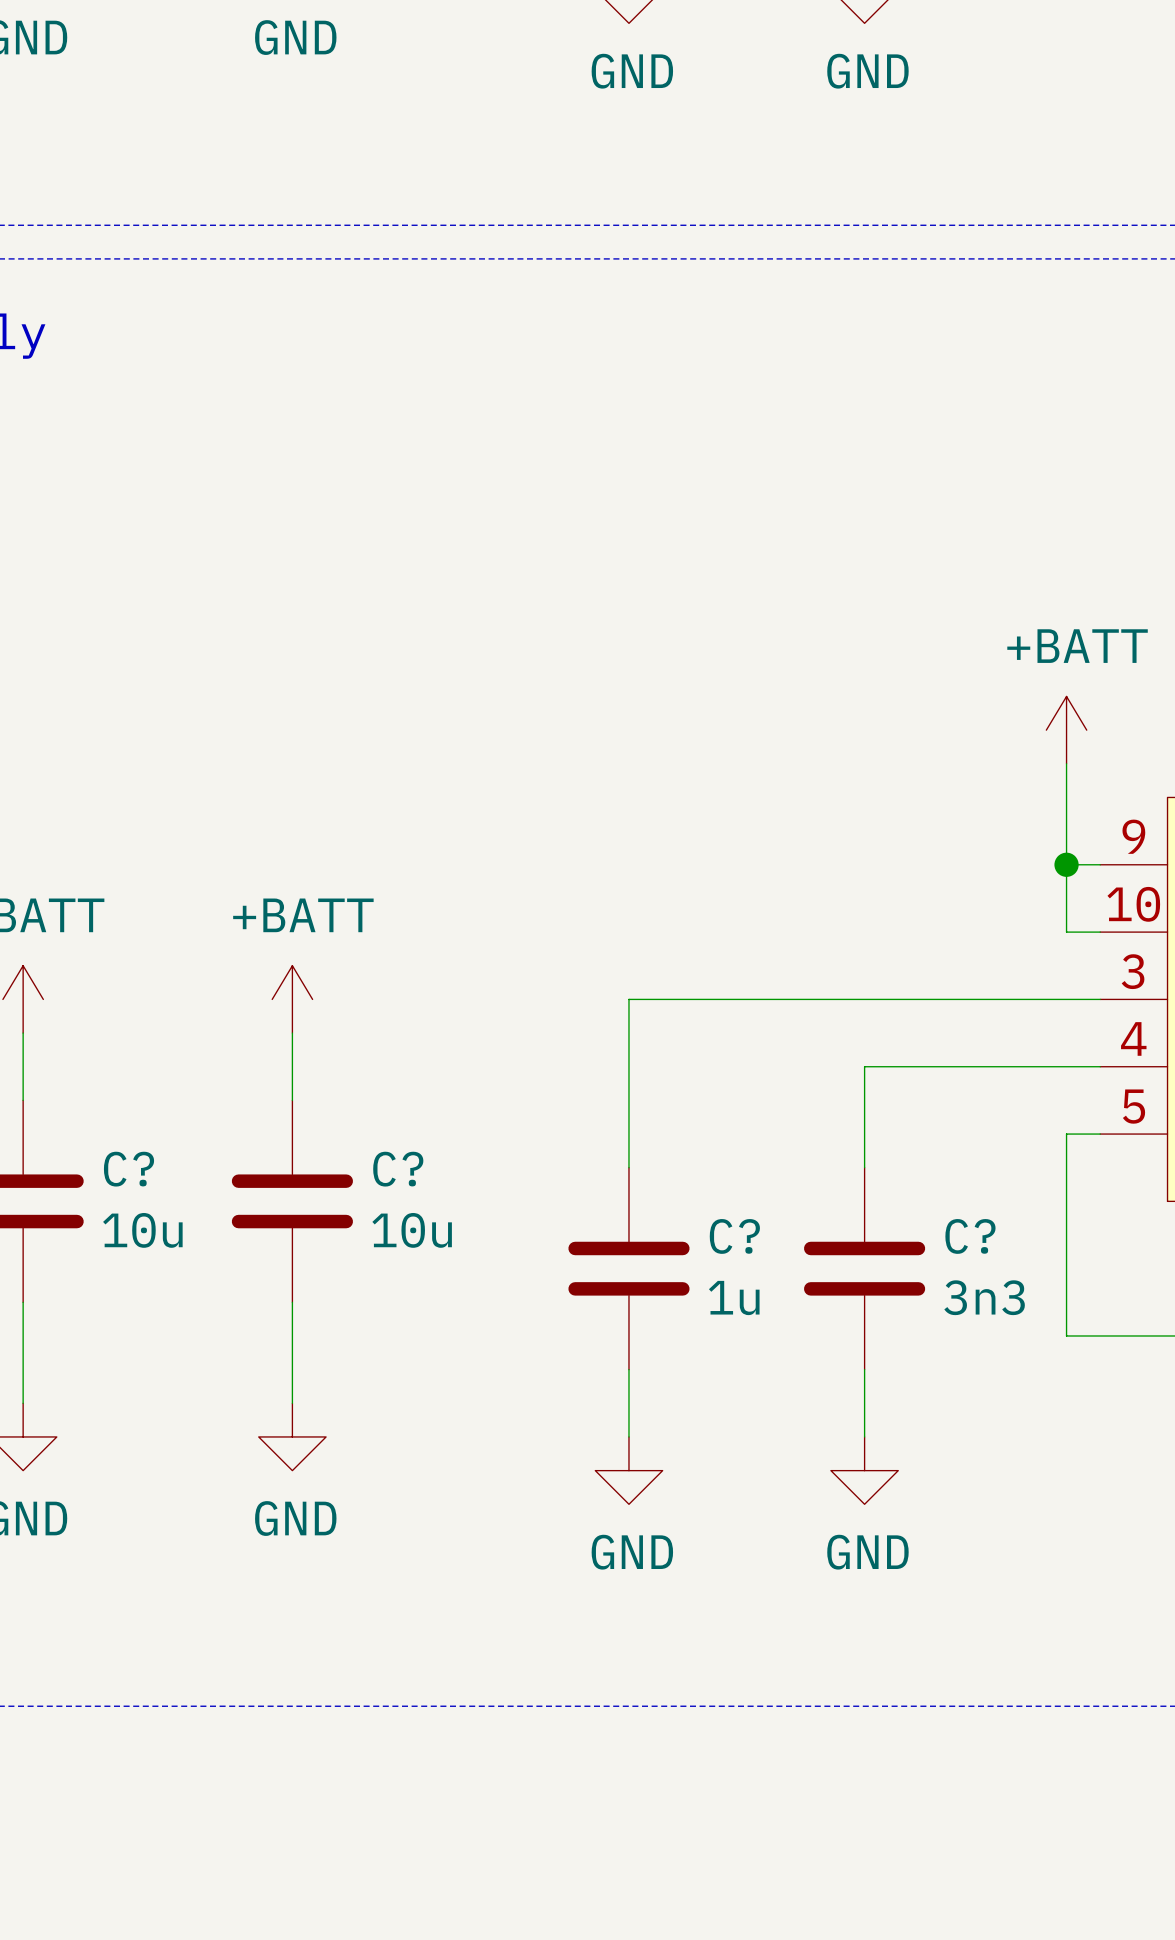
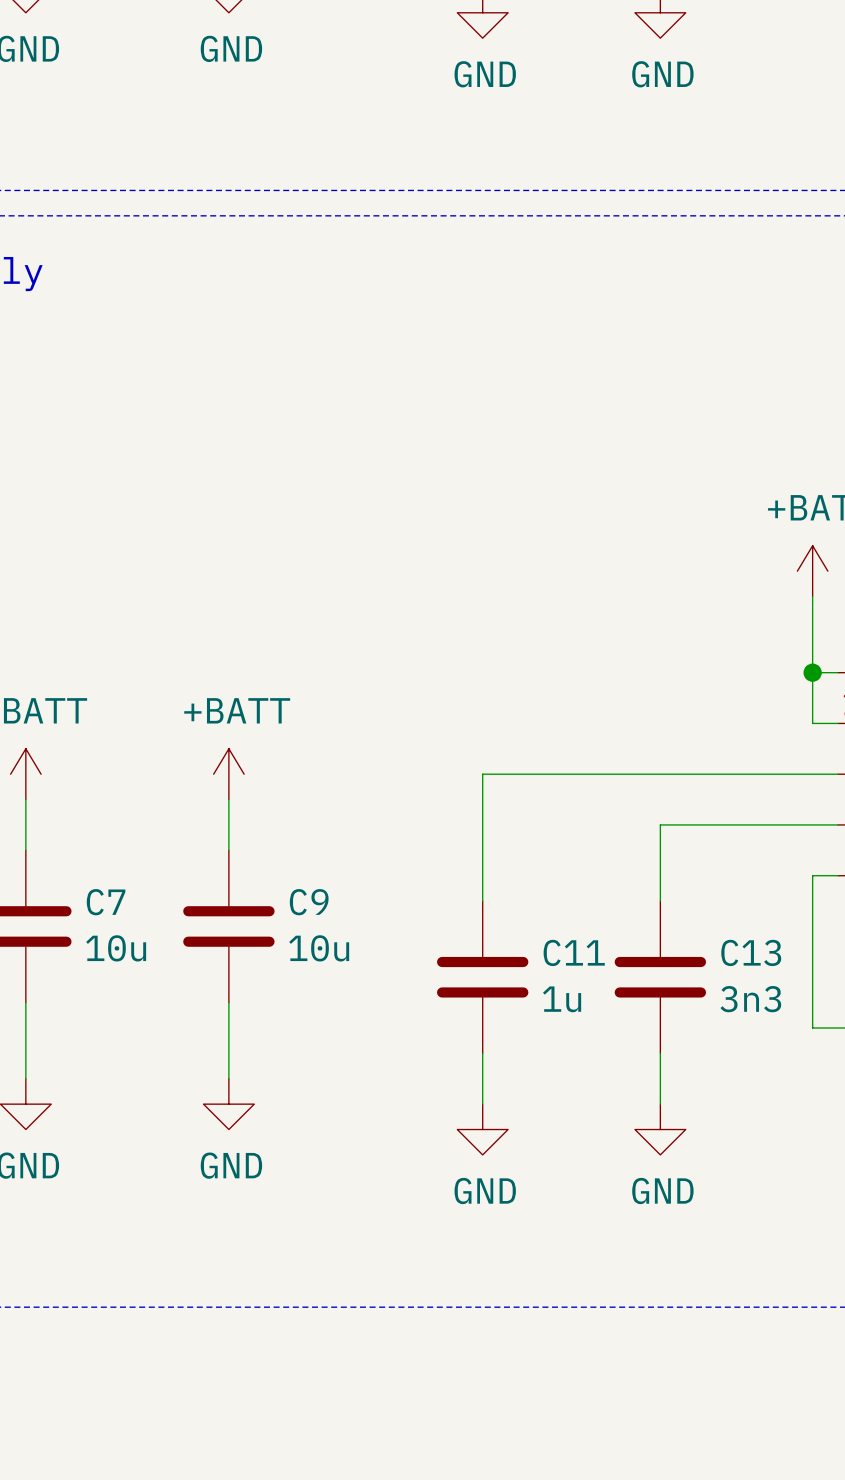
C? name: C? (129, 1169) -> C7 (106, 902)
C? name: C? (398, 1169) -> C9 (309, 902)
C? name: C? (734, 1236) -> C11 (574, 952)
C? name: C? (970, 1236) -> C13 (751, 952)

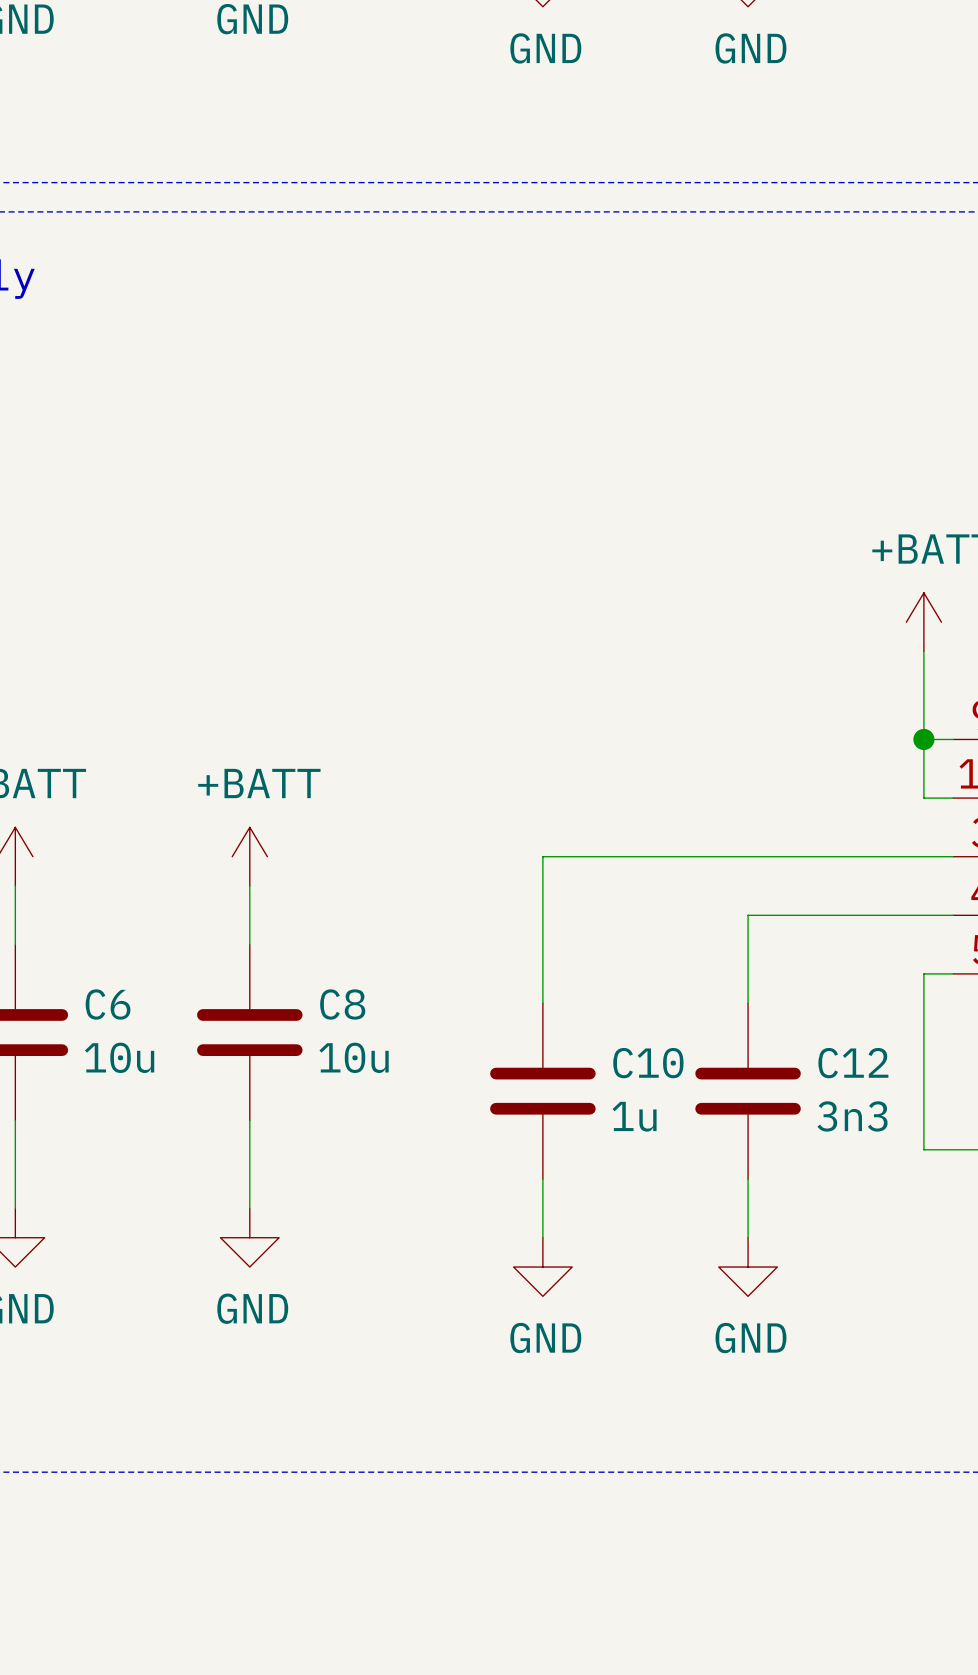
C7 name: C7 (106, 902) -> C6 (108, 1004)
C9 name: C9 (309, 902) -> C8 (342, 1004)
C11 name: C11 (574, 952) -> C10 (648, 1063)
C13 name: C13 (751, 952) -> C12 (853, 1063)

